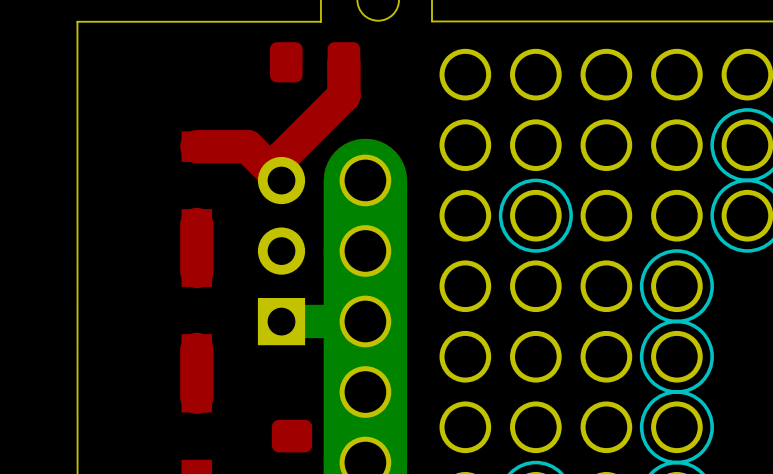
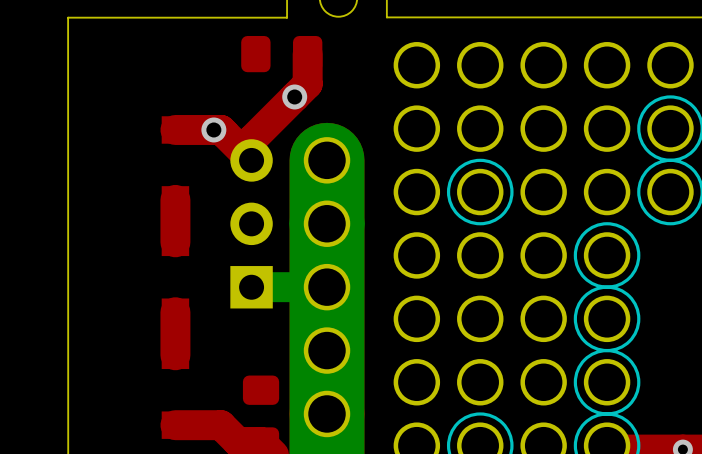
via: none -> (294, 96)
via: none -> (213, 129)

